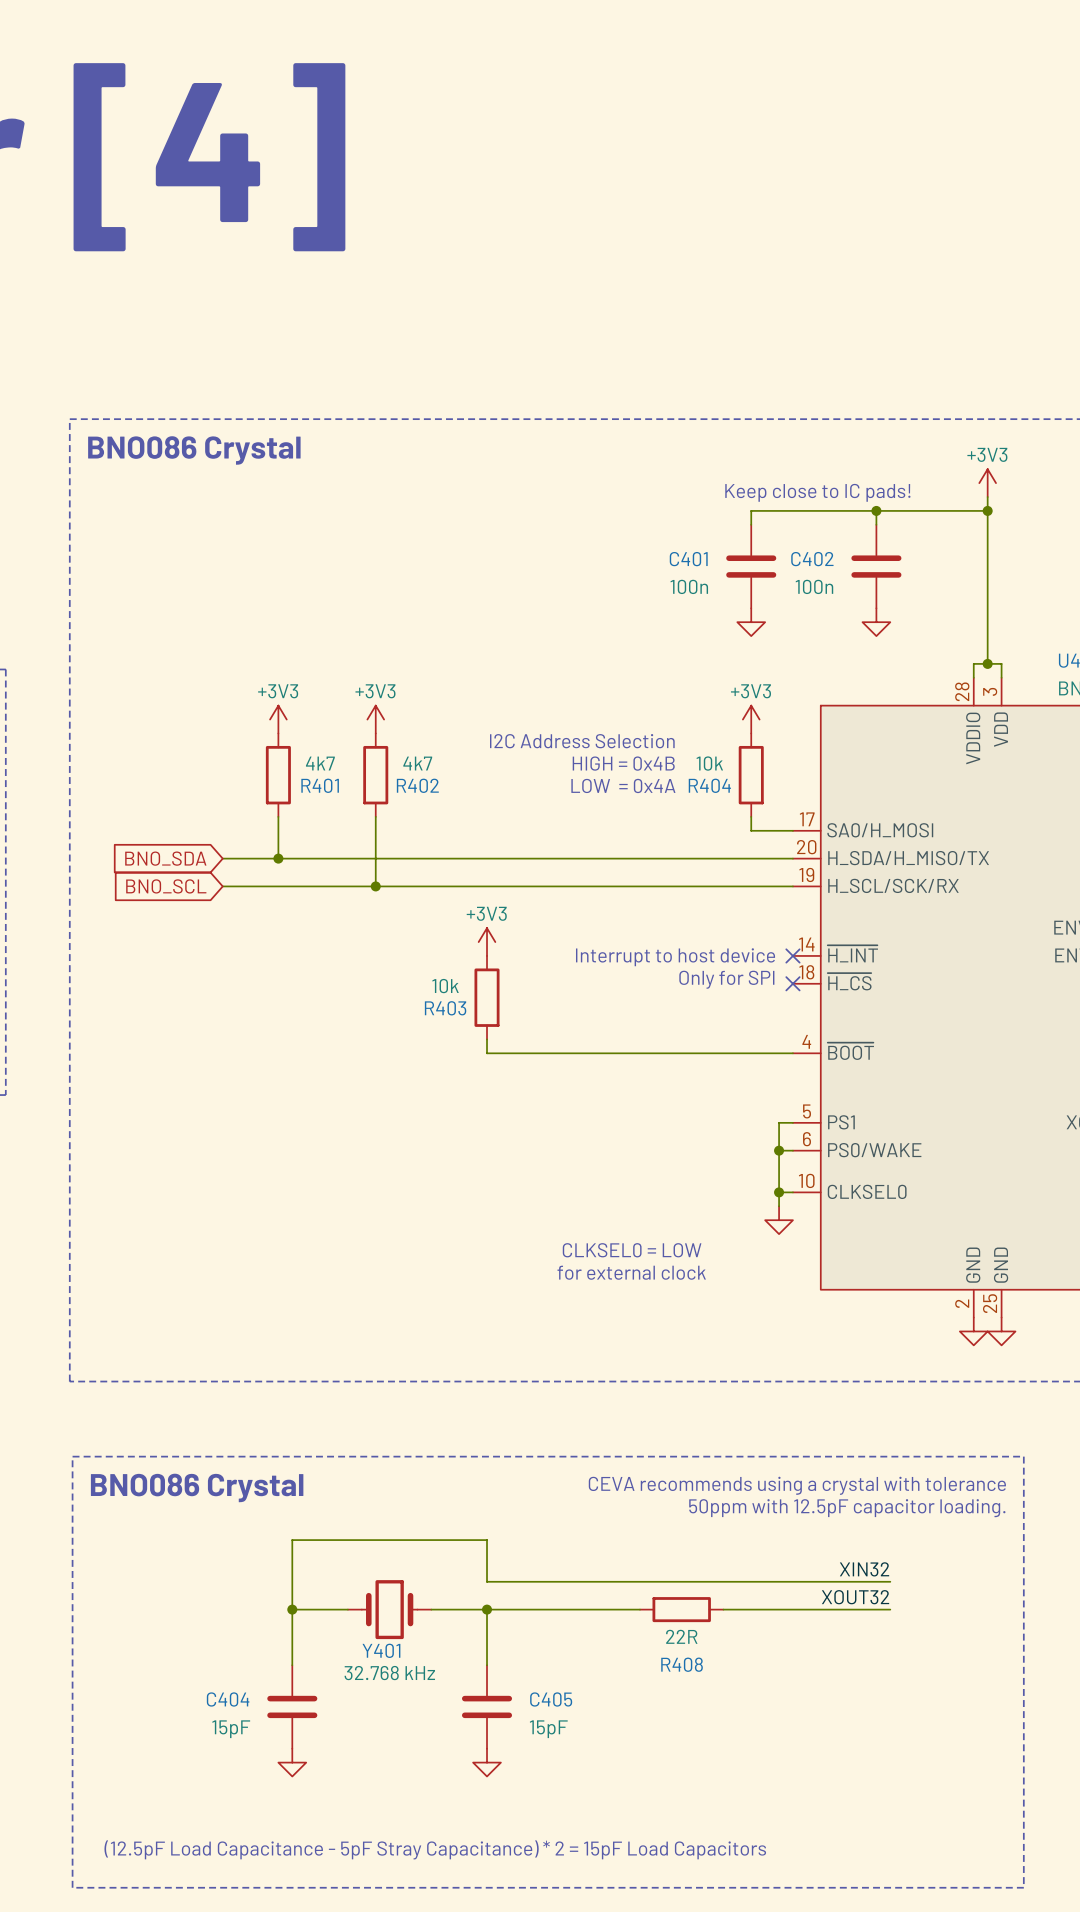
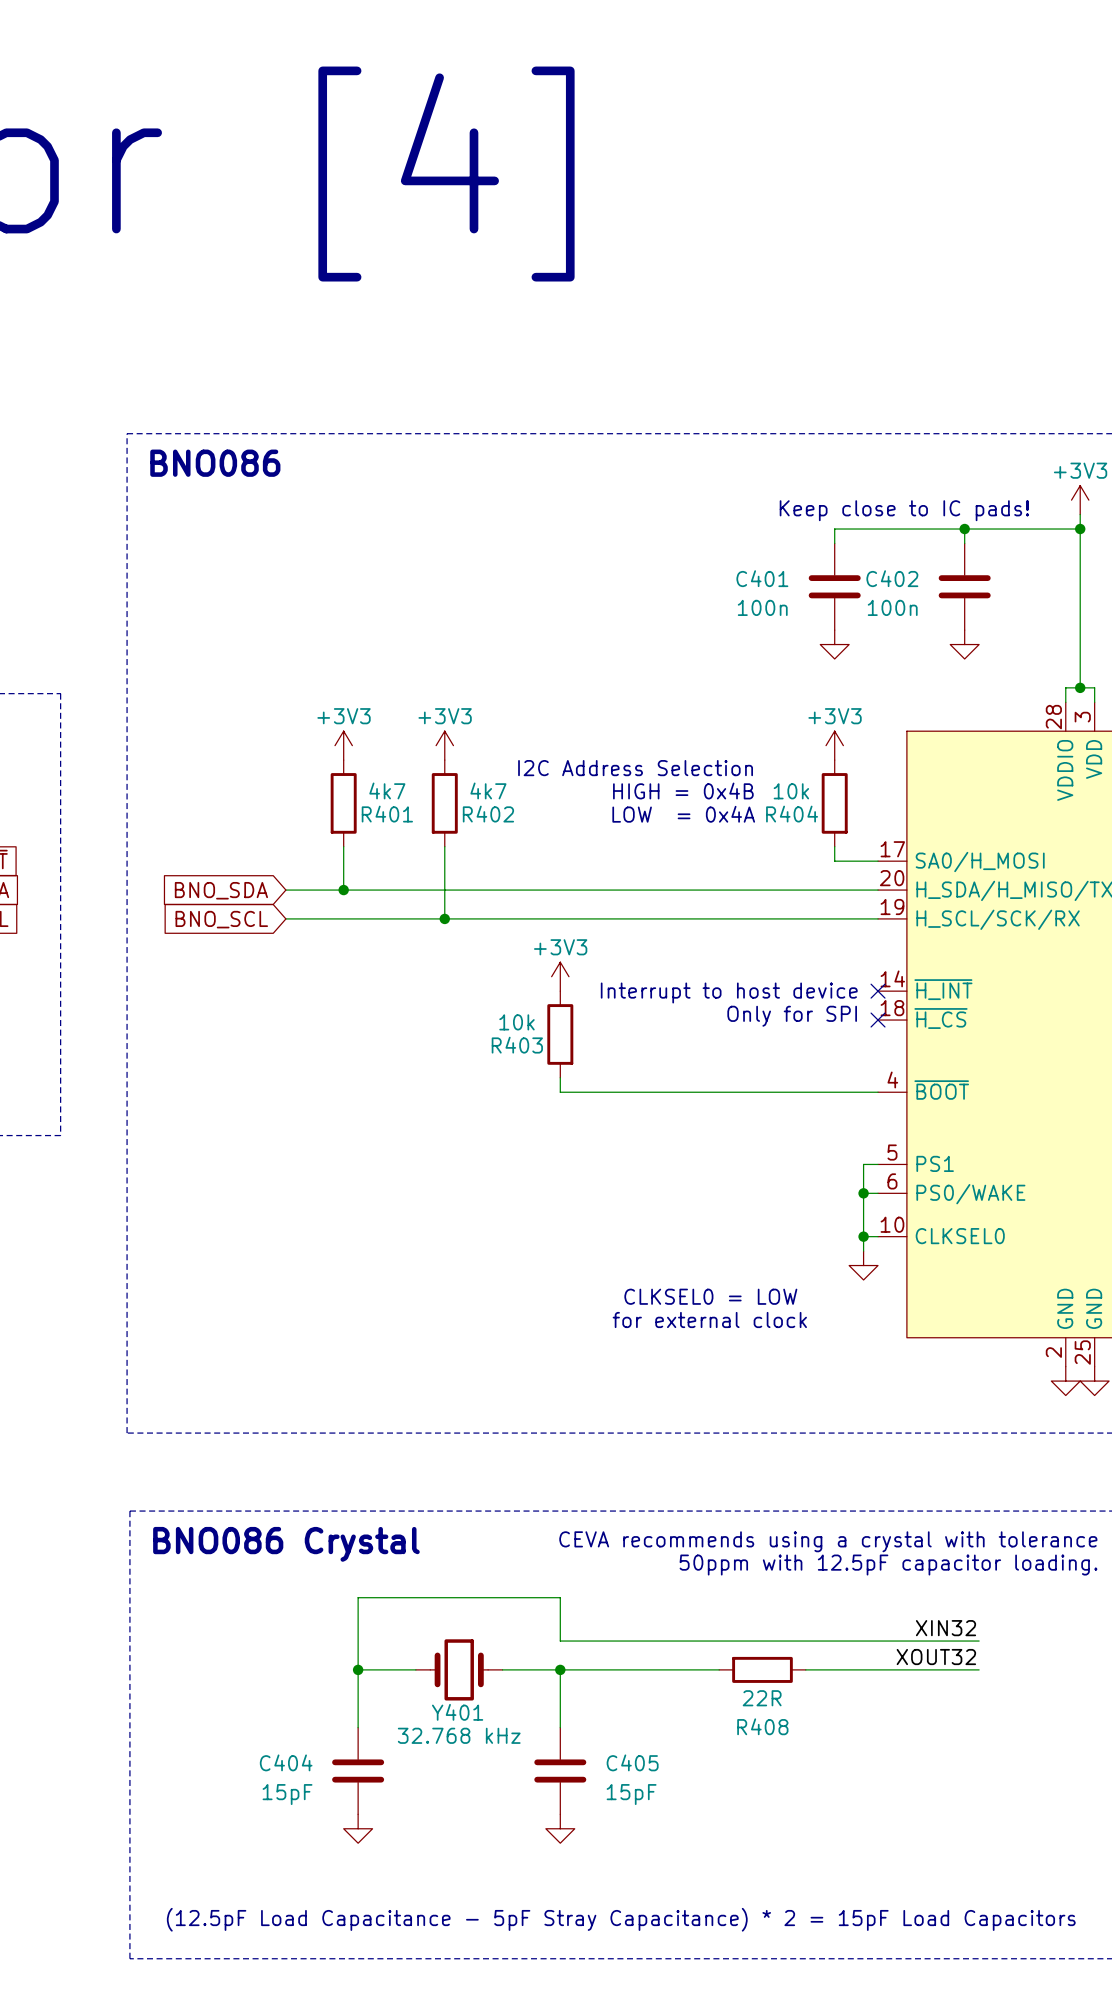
text: BNO086 Crystal (194, 450) -> BNO086 (215, 463)

